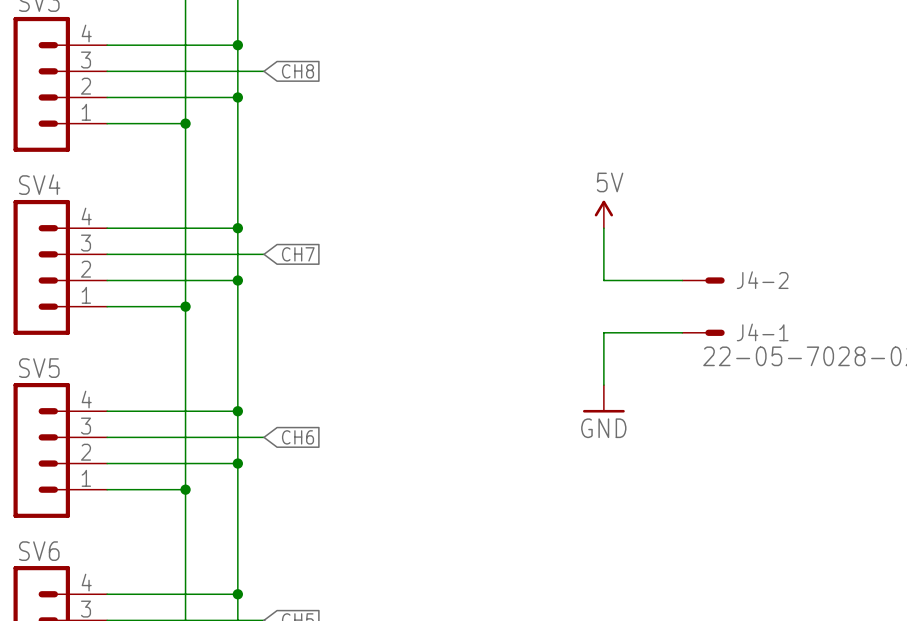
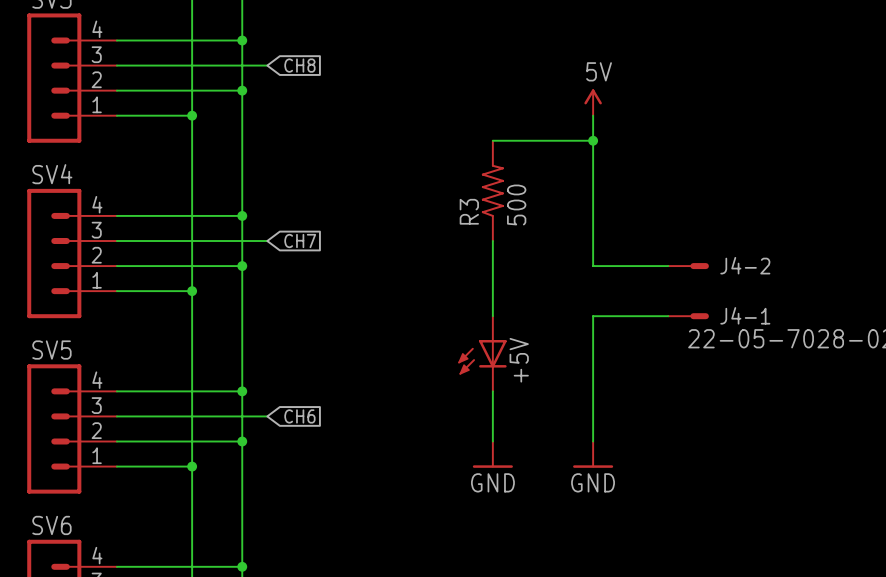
wire: none -> (593, 115) (593, 215)
wire: none -> (492, 140) (593, 140)
junction: none -> (593, 140)
R3: none -> 500 (492, 190)
power symbol position: 5V (603, 214) -> 5V (593, 102)
wire: none -> (492, 241) (492, 316)
+5V: none -> (482, 353)
wire: none -> (593, 366) (593, 441)
power symbol: GND (603, 398) -> none
wire: none -> (492, 391) (492, 441)
power symbol: none -> GND (492, 454)
power symbol: none -> GND (593, 454)

